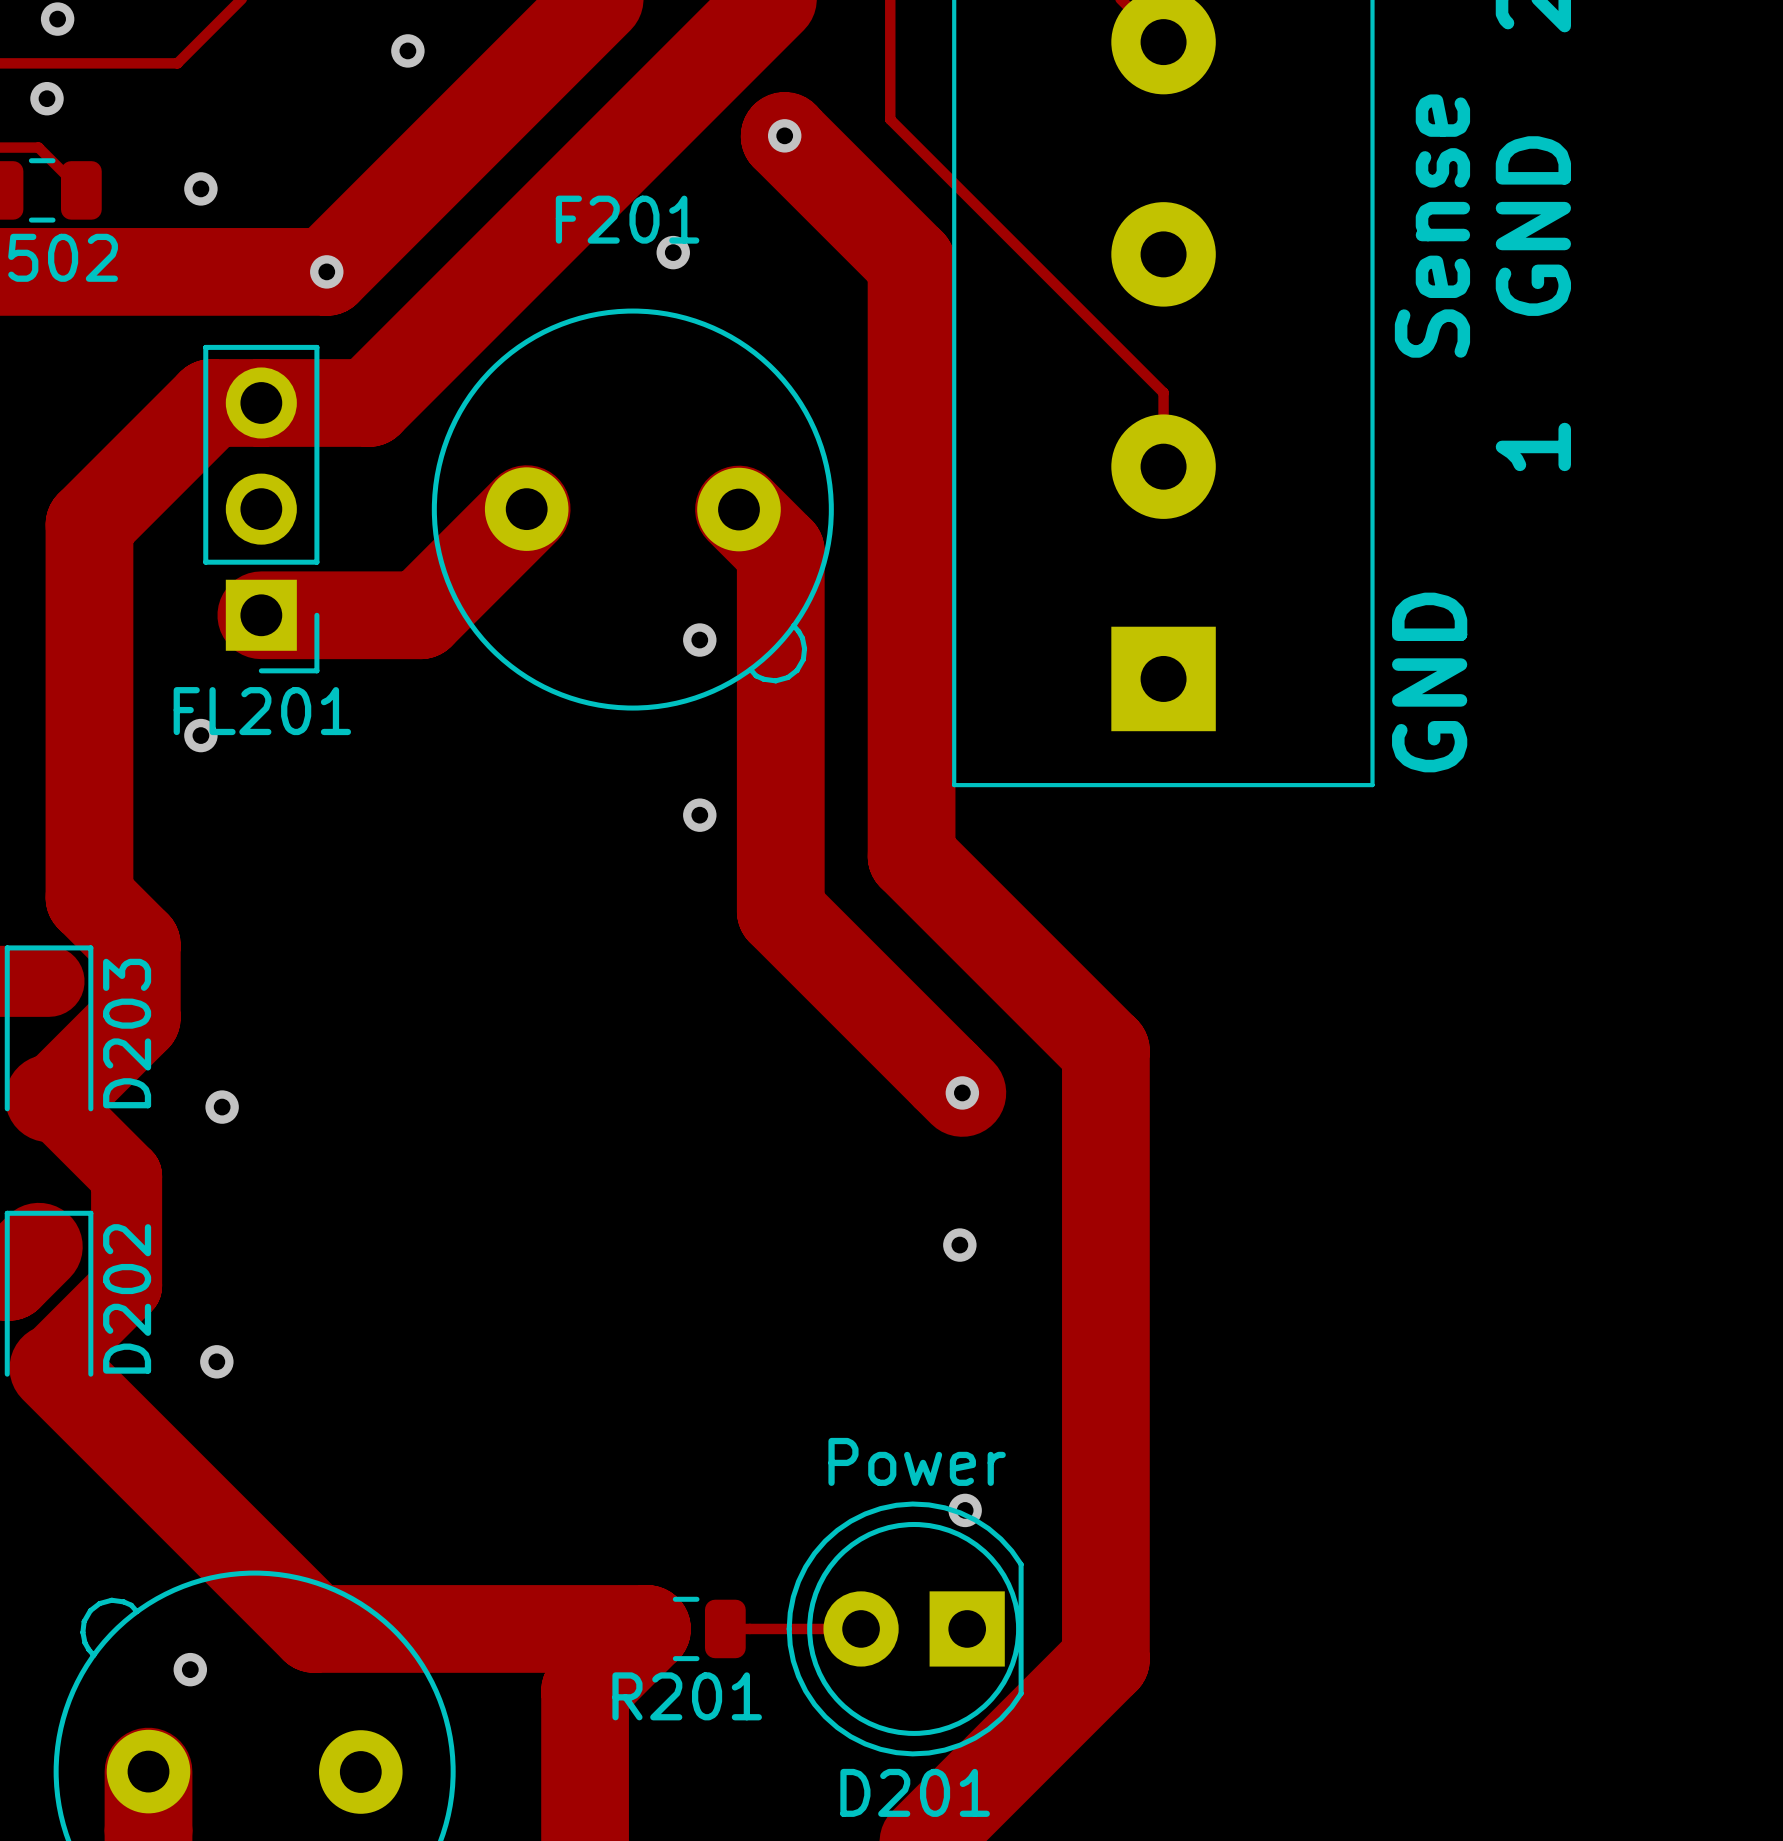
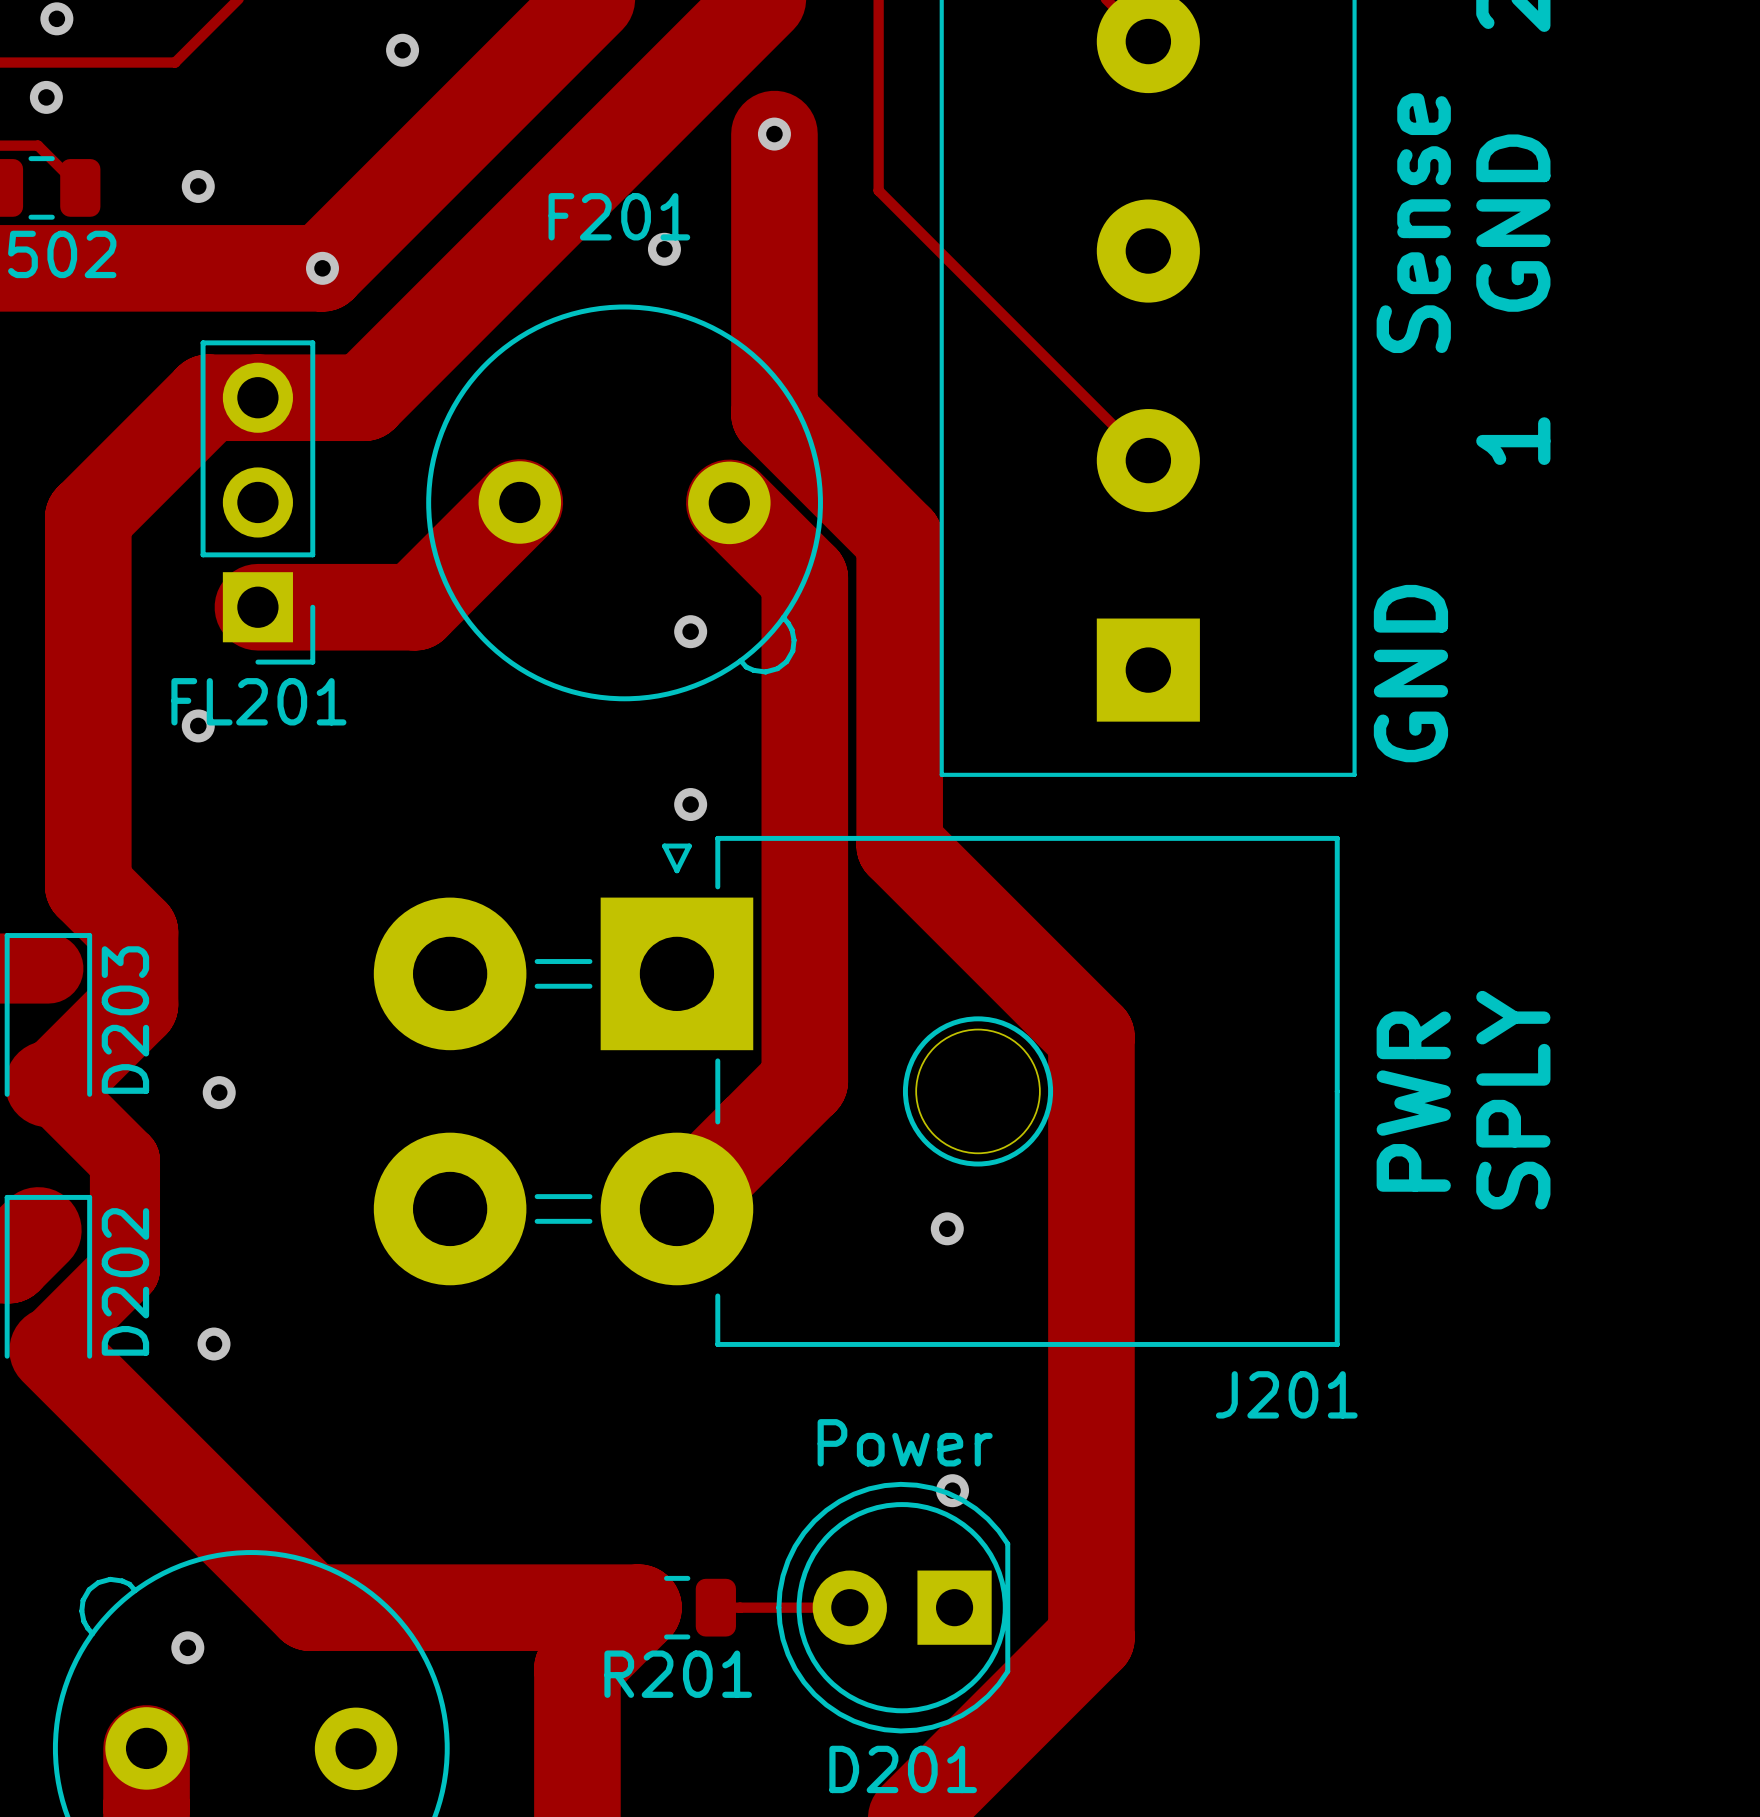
track: (890, 119) (1163, 392) (1163, 466) -> (878, 117) (878, 190) (1148, 460)
track: (784, 136) (911, 263) (911, 546) -> (774, 134) (774, 413) (899, 539)
track: (780, 551) (780, 911) (962, 1092) -> (770, 544) (804, 578) (804, 1081) (676, 1208)
via: (962, 1092) -> none
J201: none -> (856, 1091)
text: none -> SPLY (1513, 1100)
text: none -> PWR (1413, 1101)

